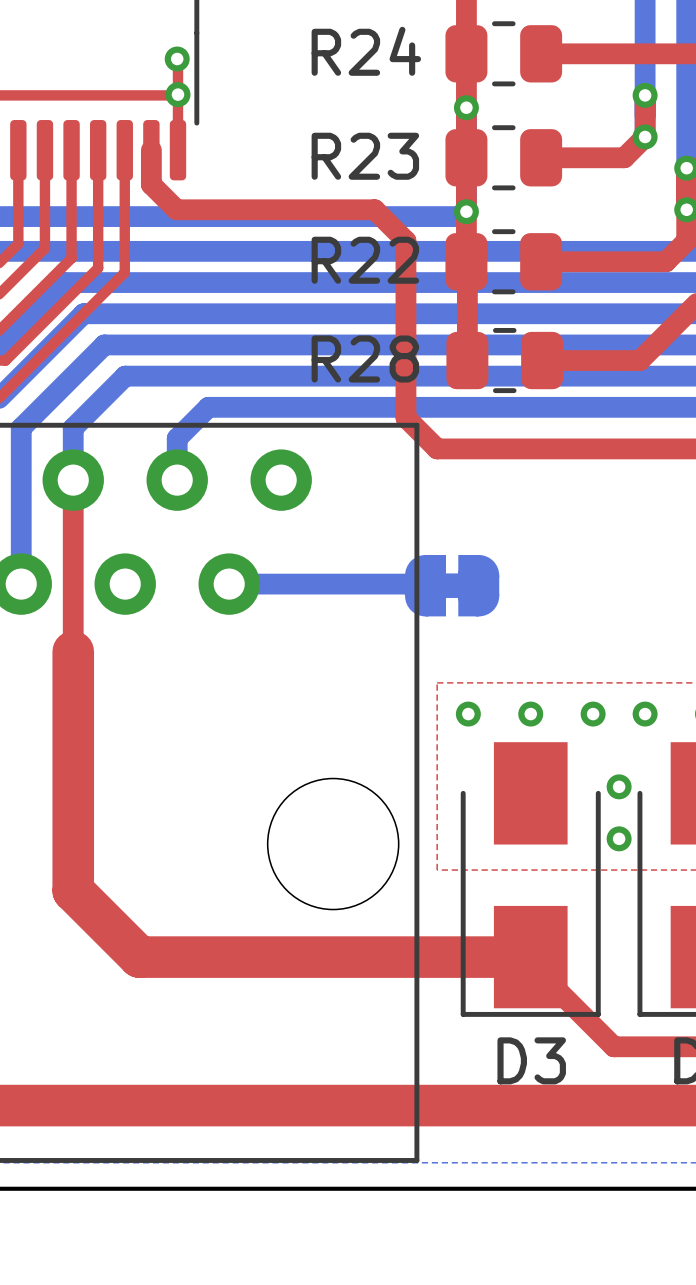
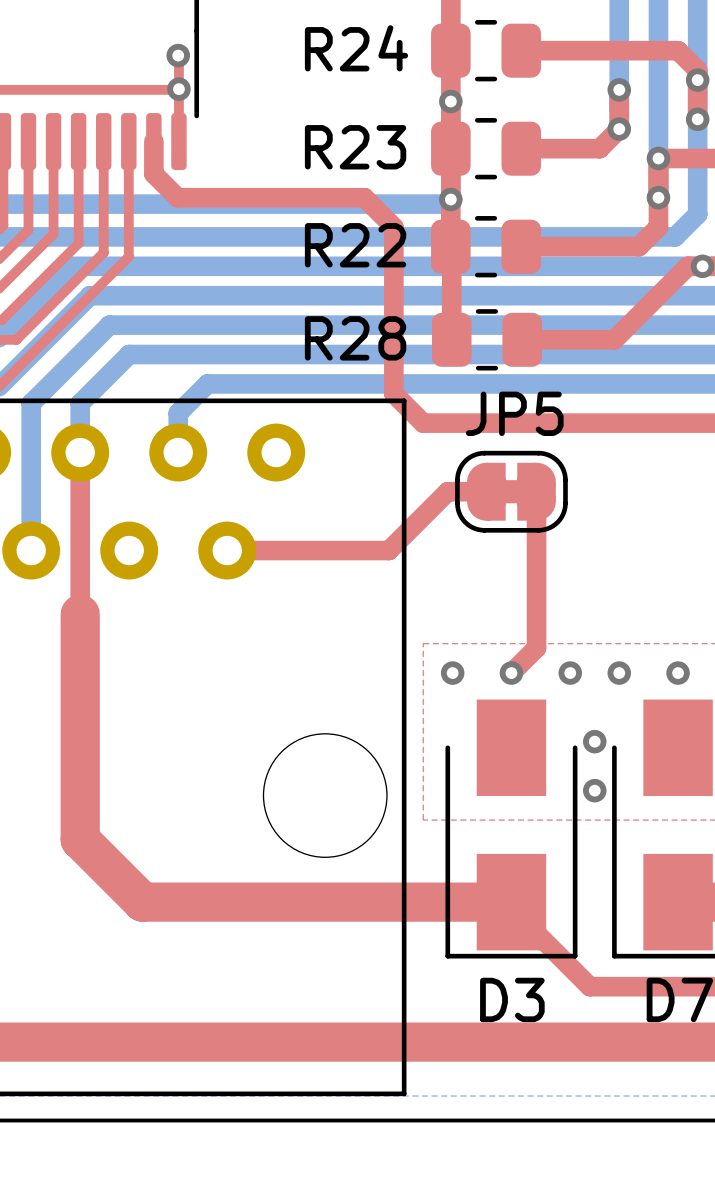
top track: none -> (486, 491) (447, 491) (388, 550) (227, 550)
top track: none -> (536, 491) (536, 647) (511, 673)
bottom track: (229, 584) (408, 584) (410, 585) -> none
JP5 side: bottom (452, 585) -> top (511, 491)

